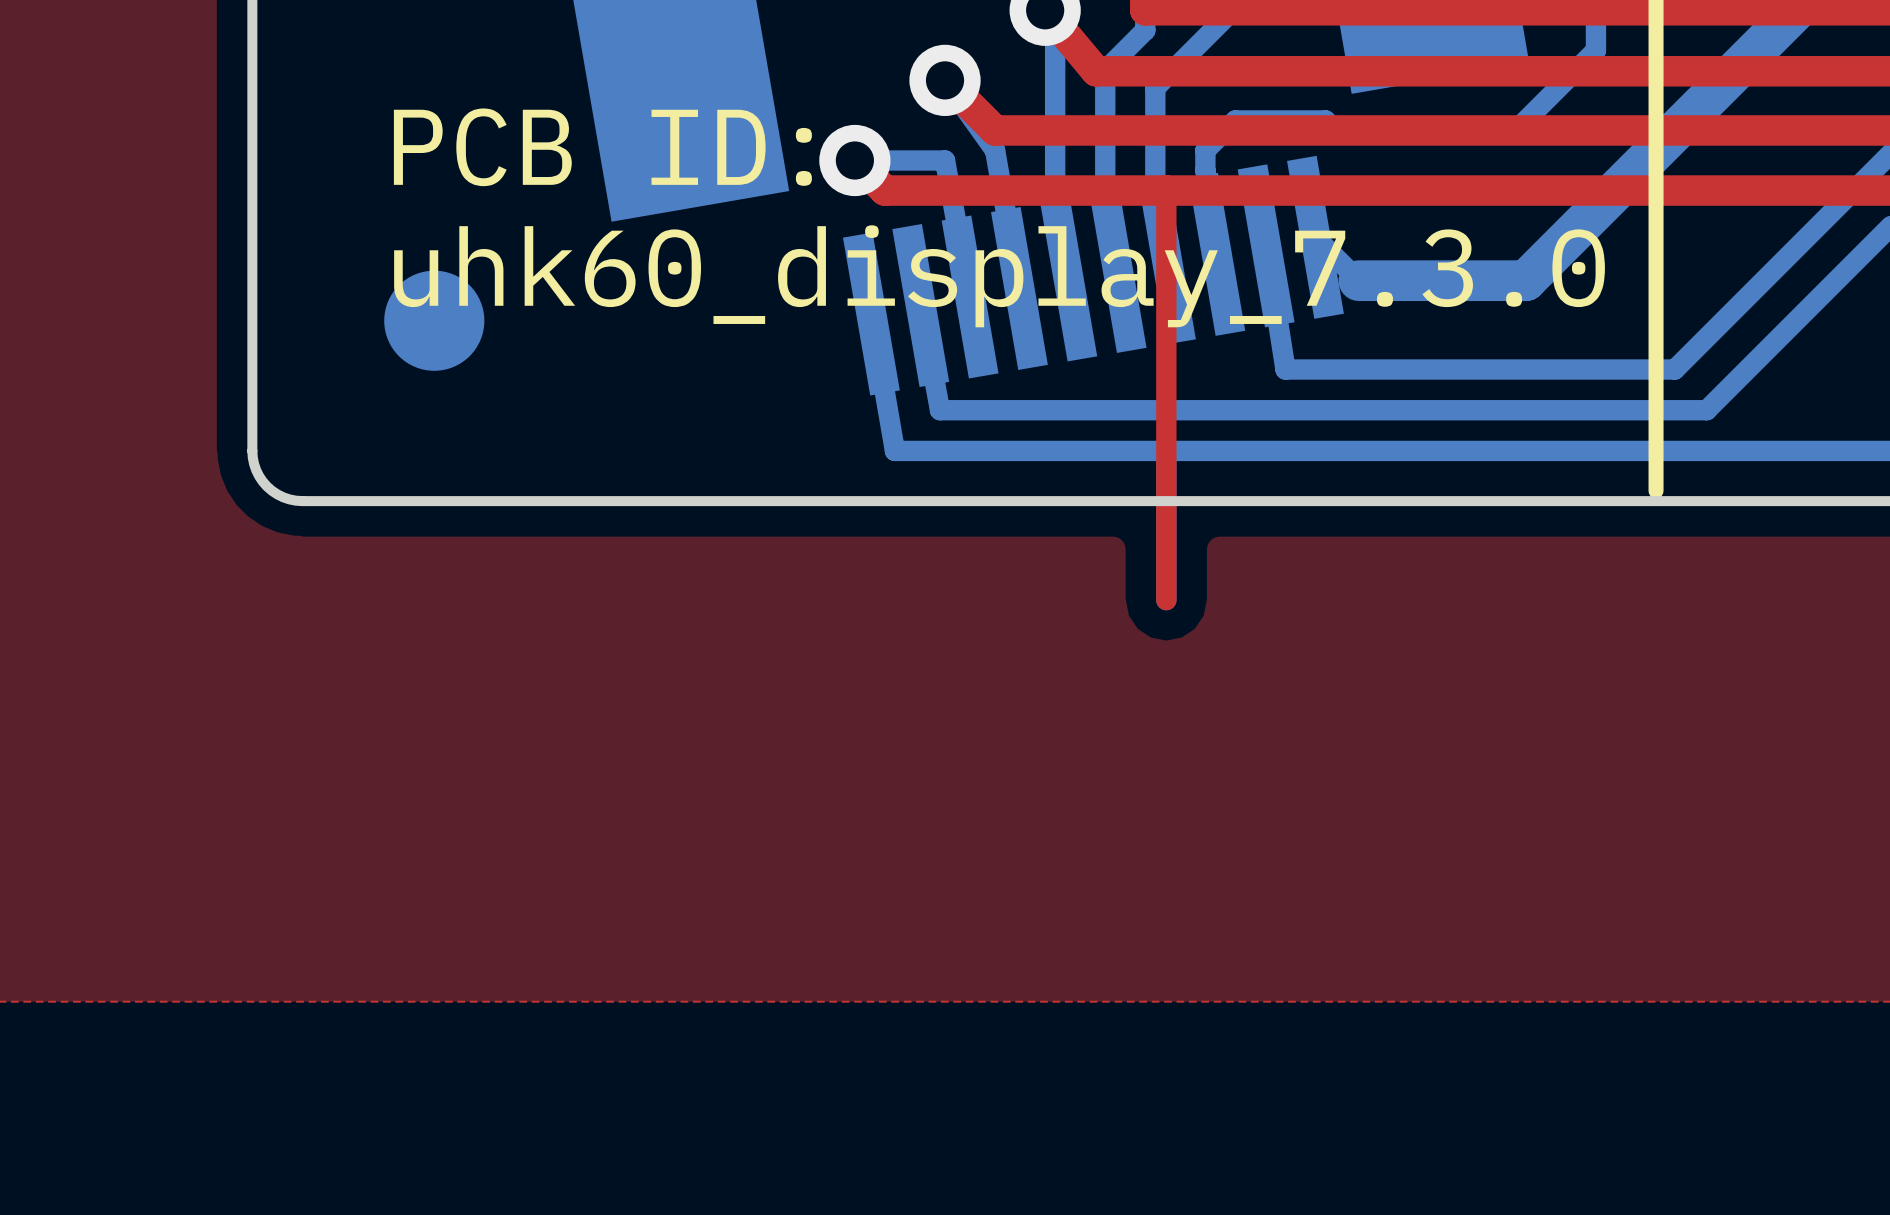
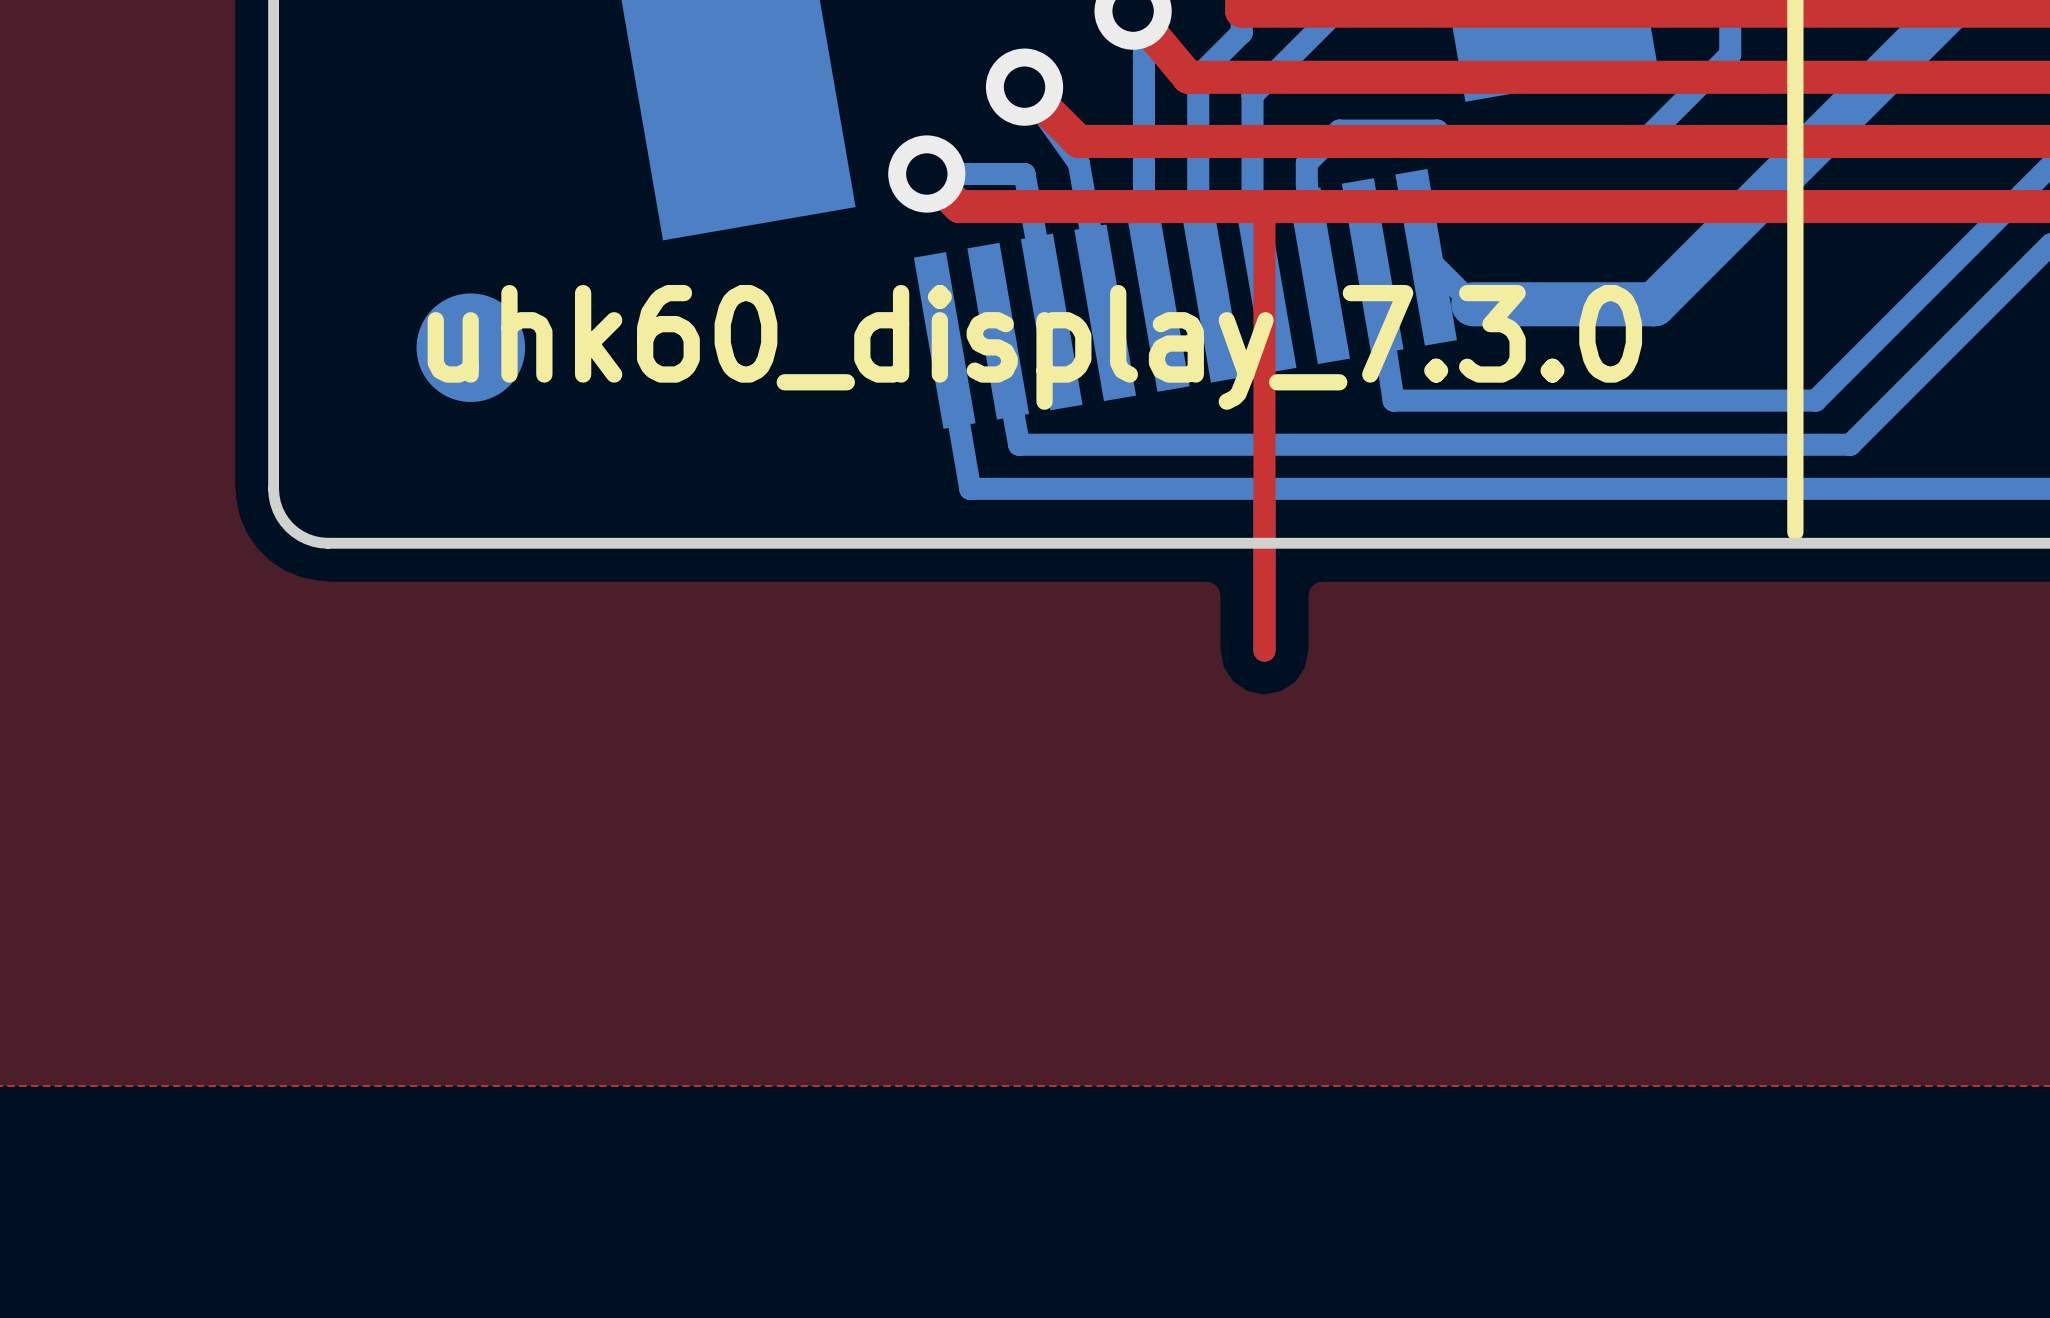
text: PCB ID: (602, 147) -> none
text position: uhk60_display_7.3.0 (999, 276) -> uhk60_display_7.3.0 (1034, 347)

